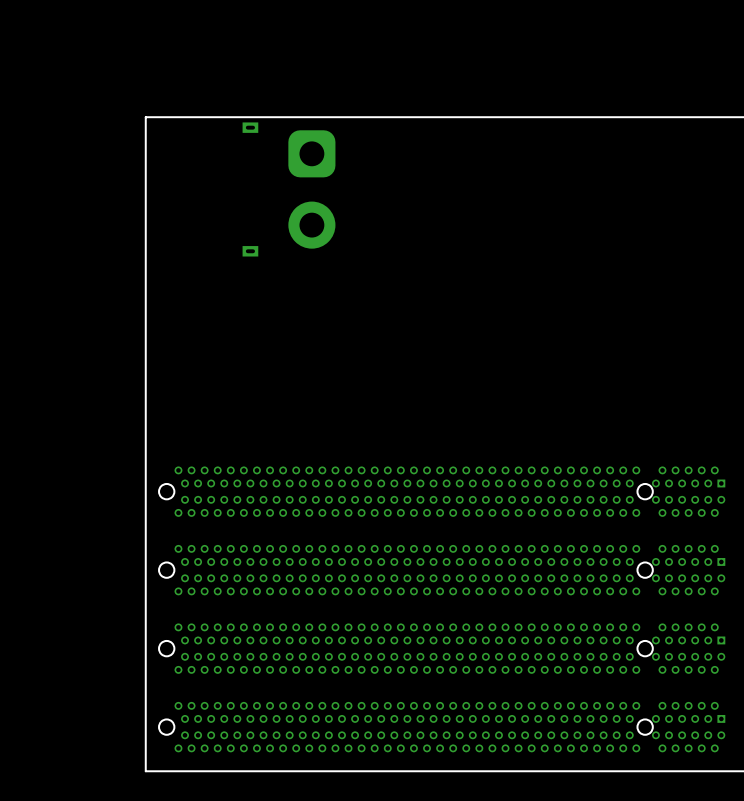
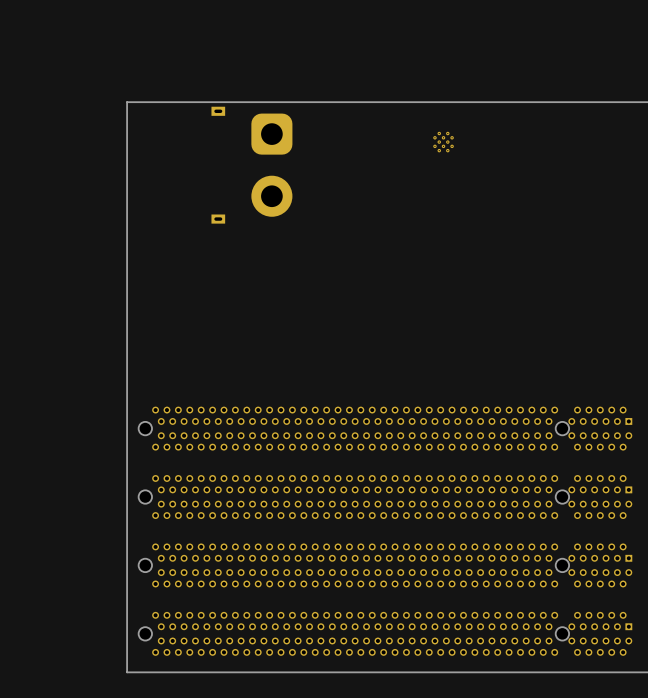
part: none -> (443, 142)

